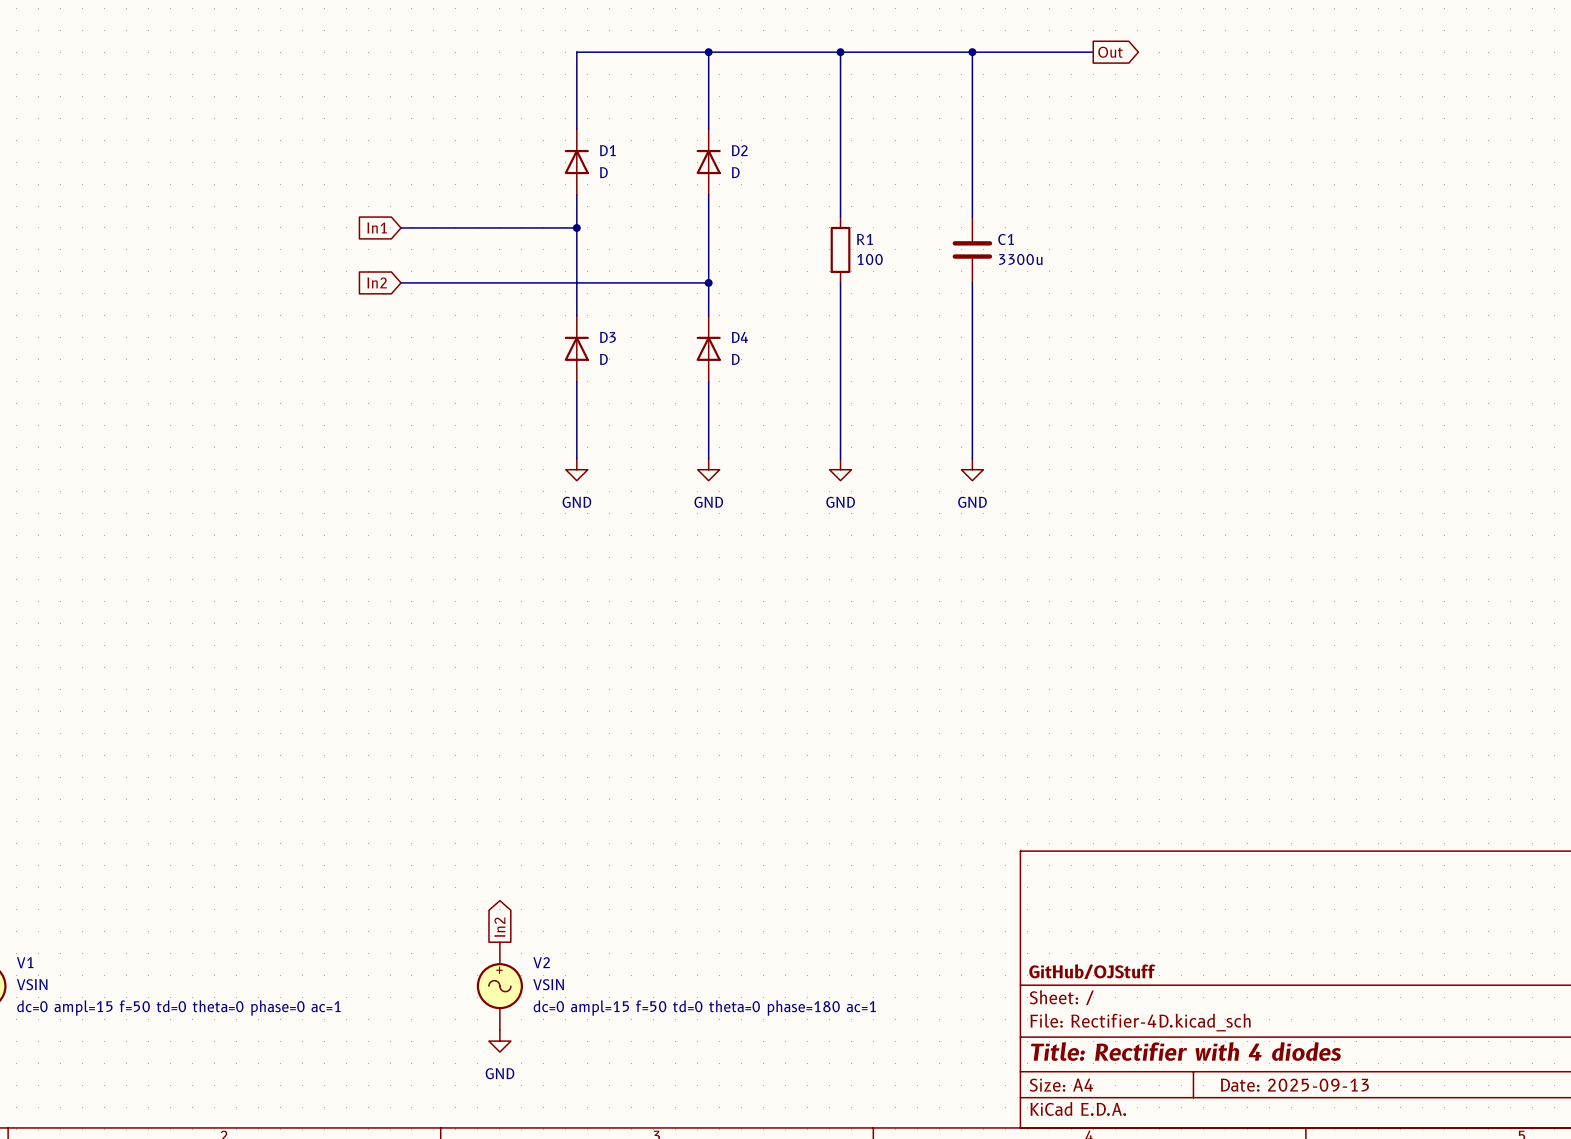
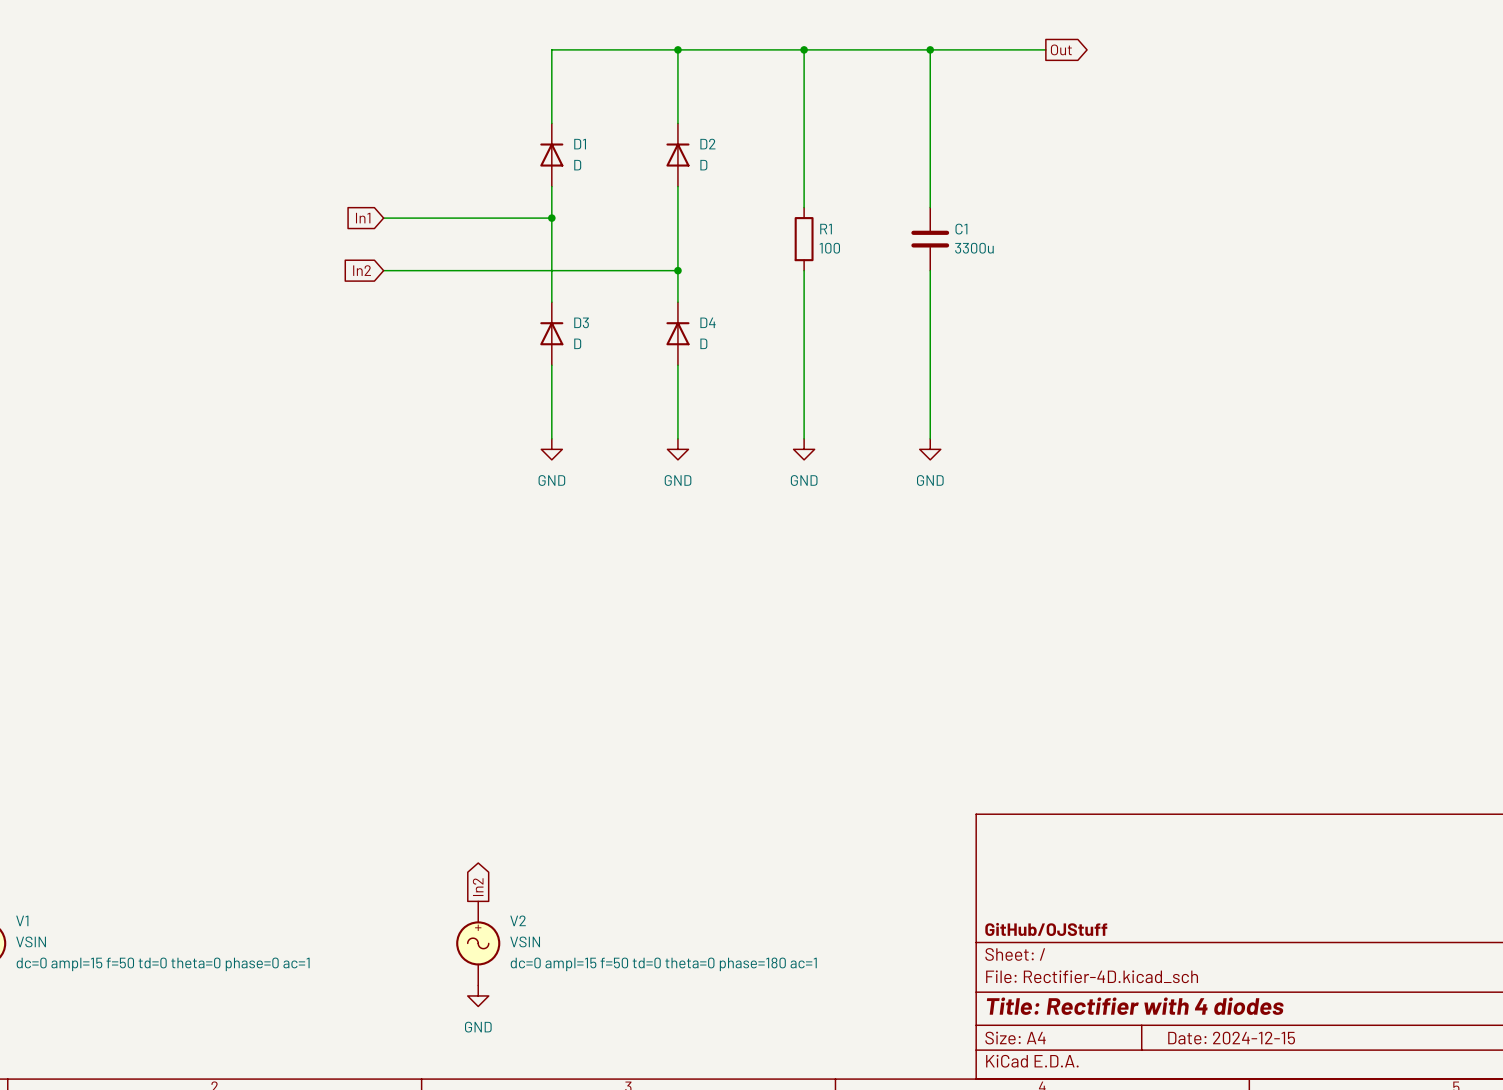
title block: Date: 2025-09-13 (1294, 1085) -> Date: 2024-12-15 (1231, 1038)

